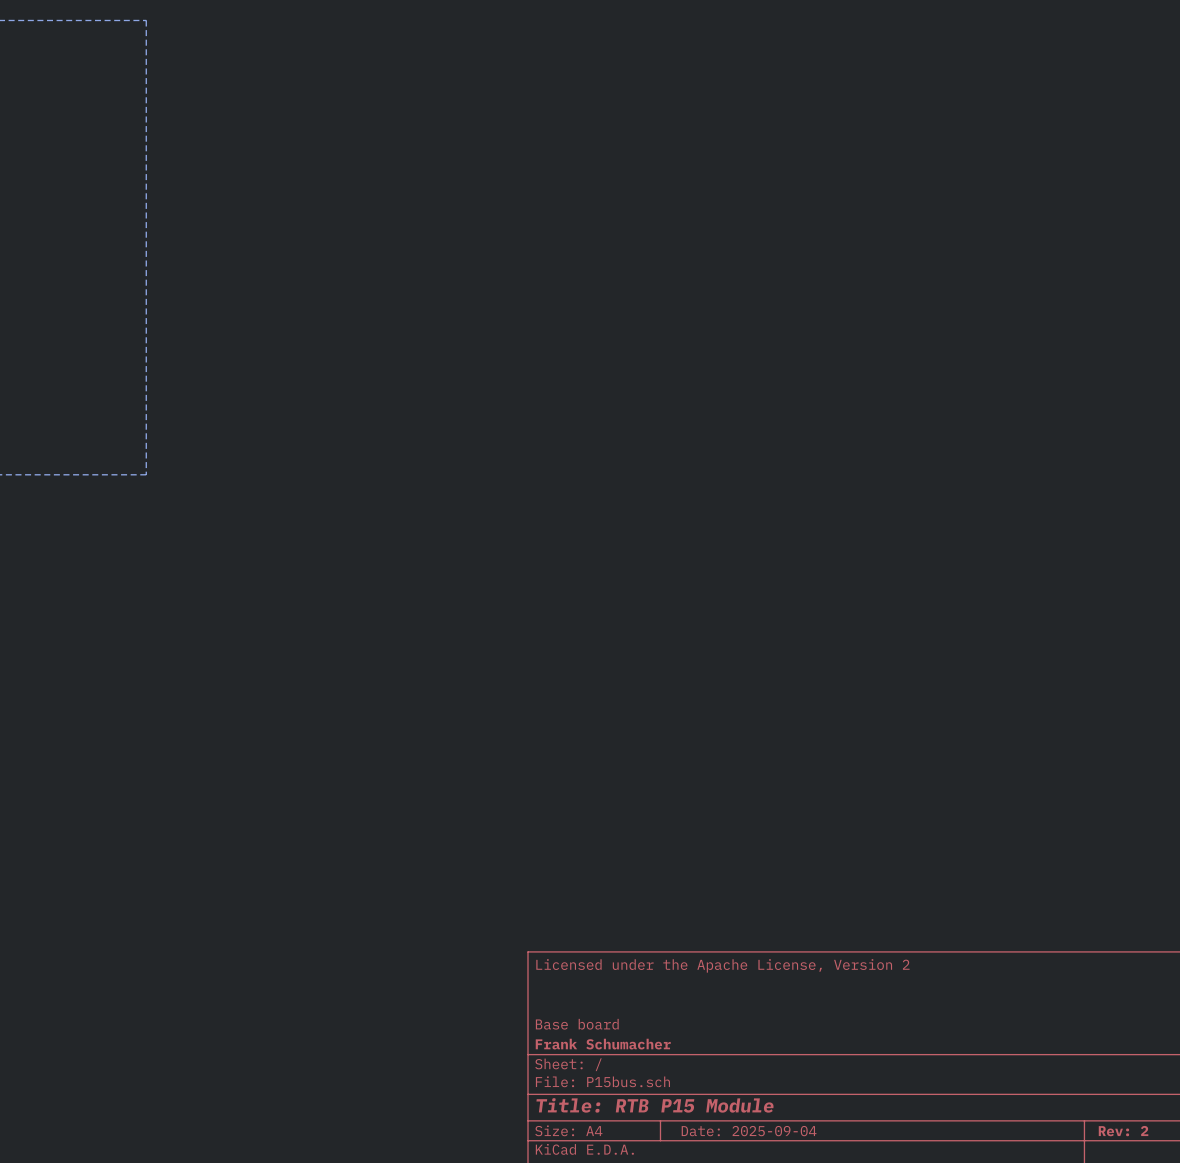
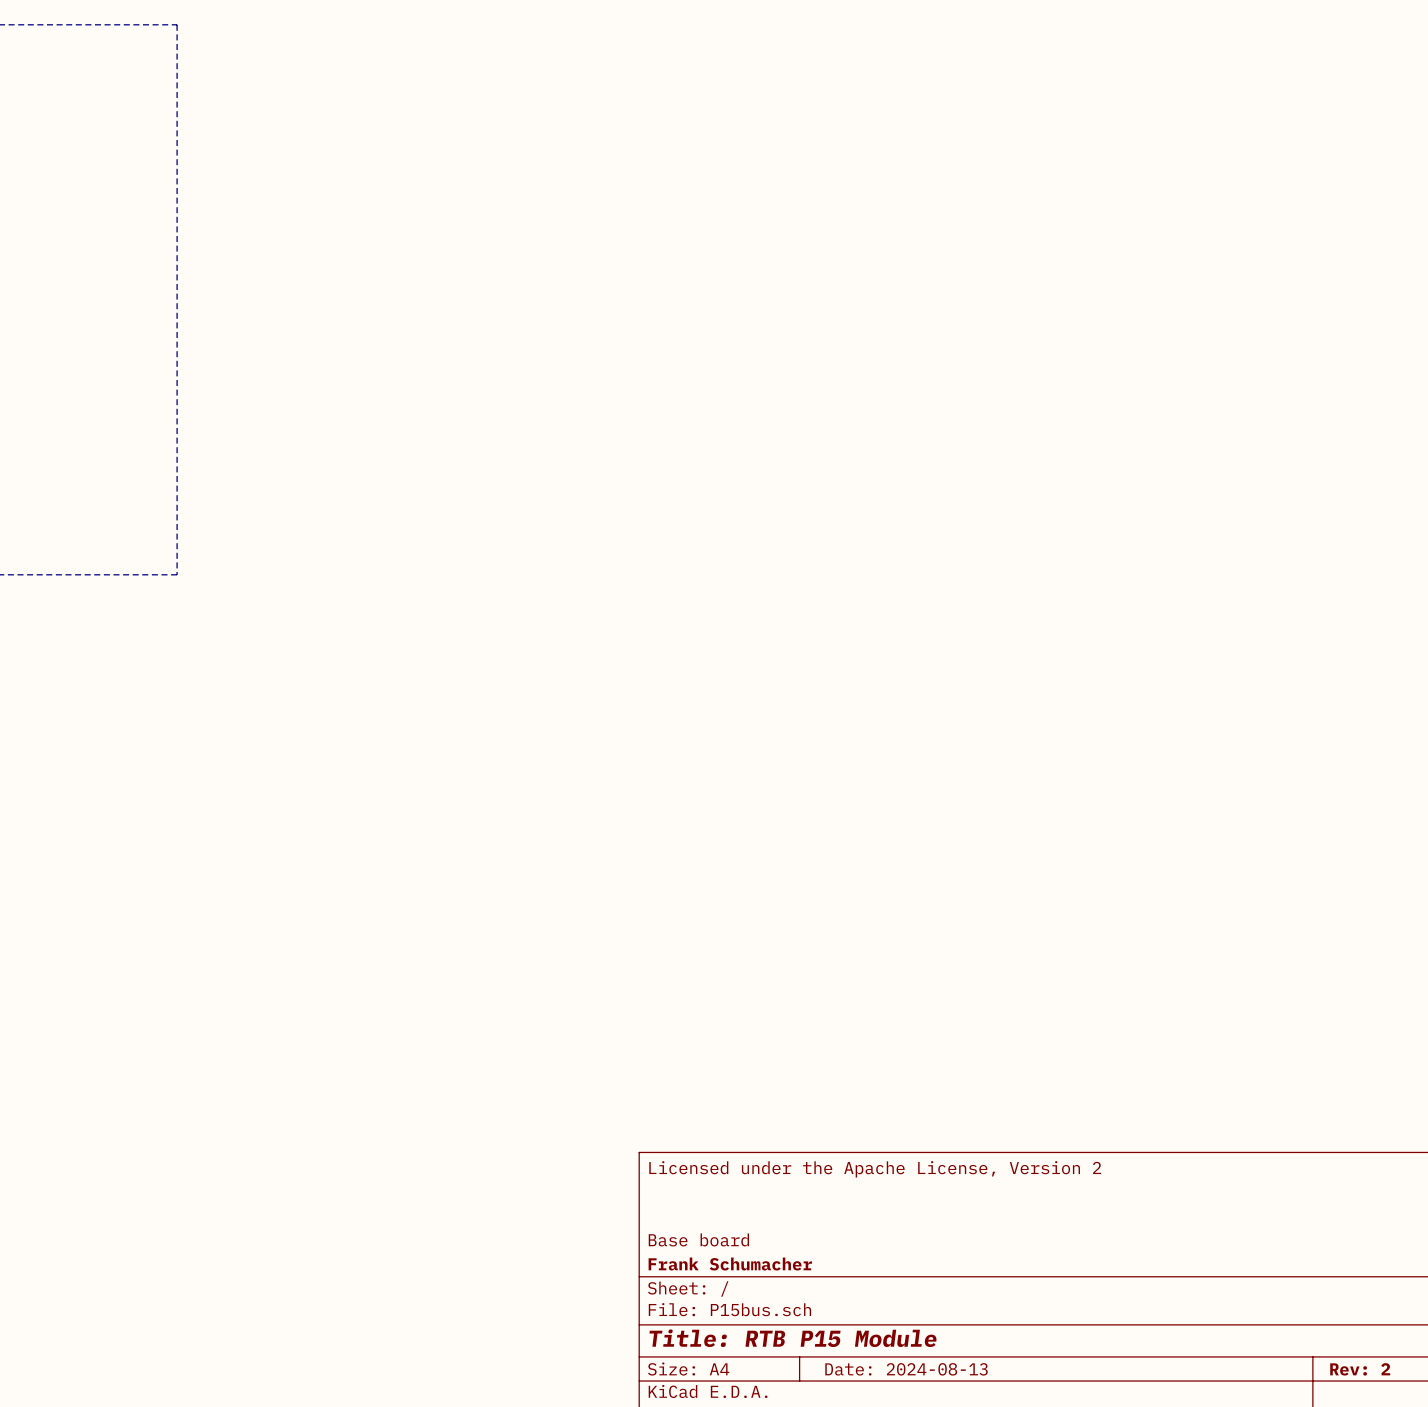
title block: Date: 2025-09-04 (749, 1131) -> Date: 2024-08-13 (906, 1369)

